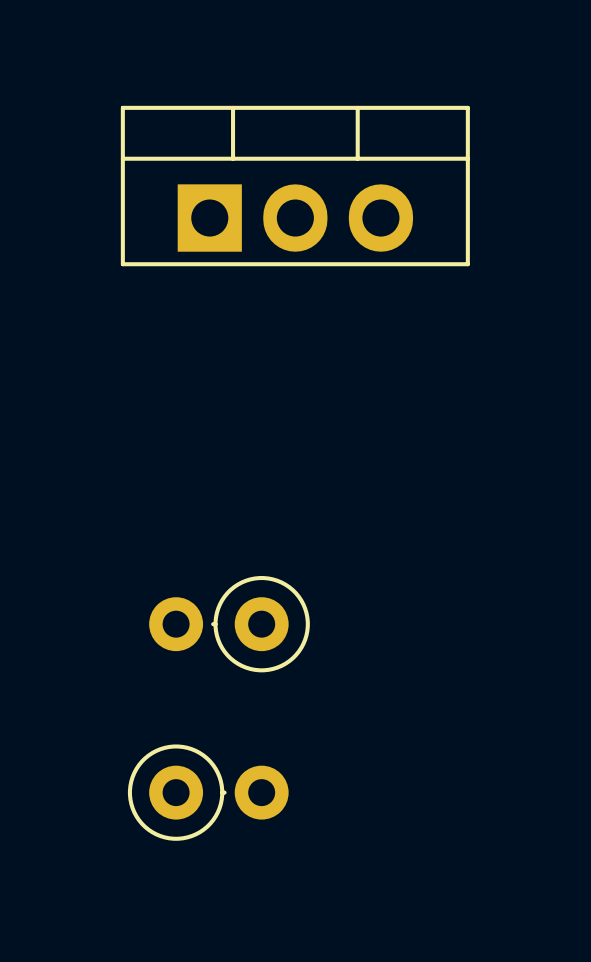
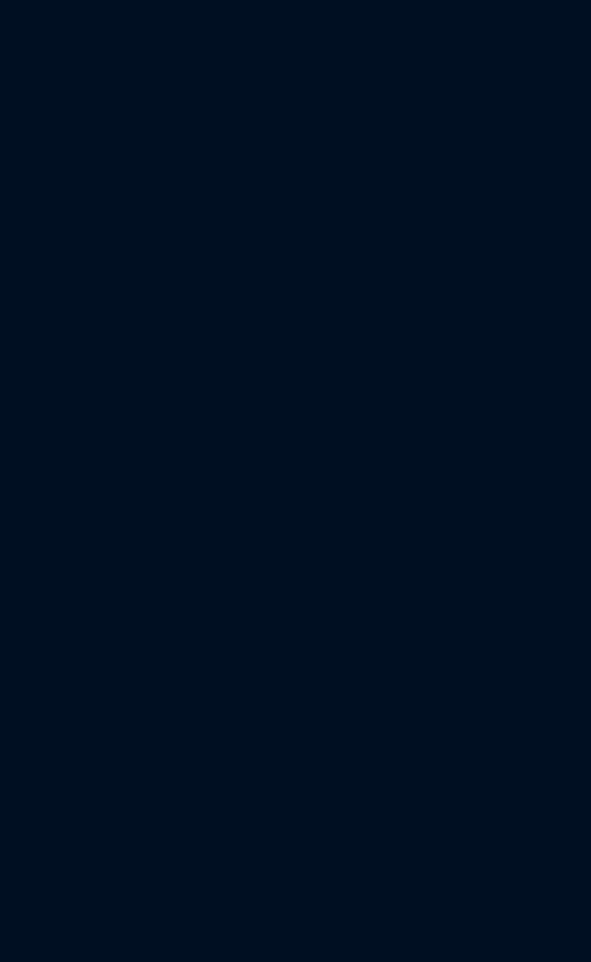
part: (295, 186) -> none
part: (229, 624) -> none
part: (208, 792) -> none

